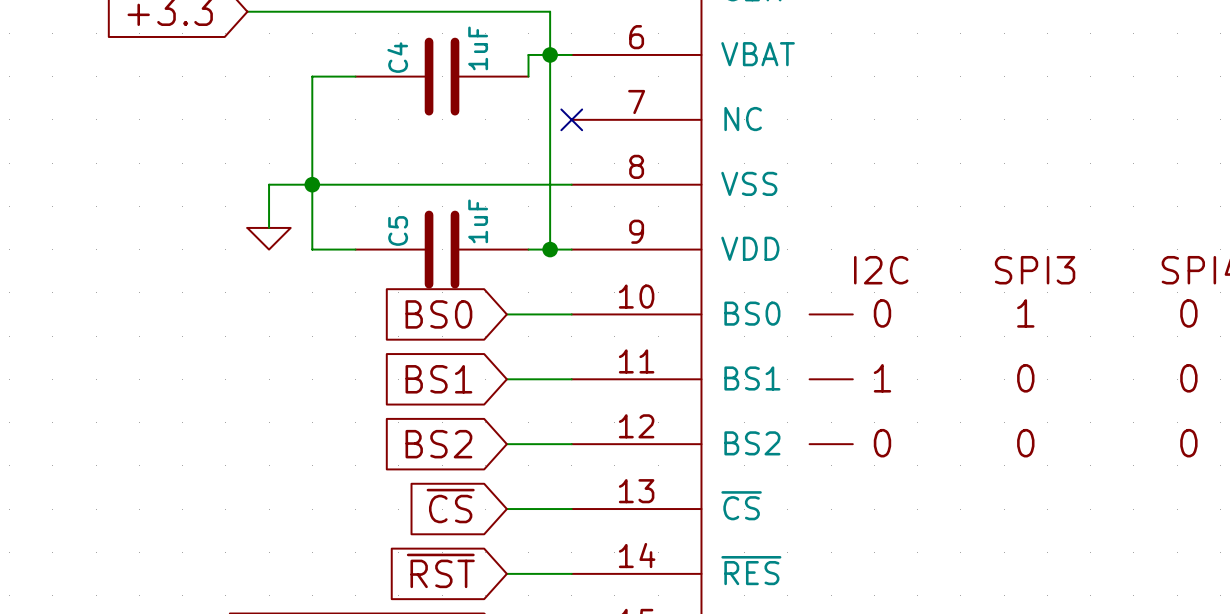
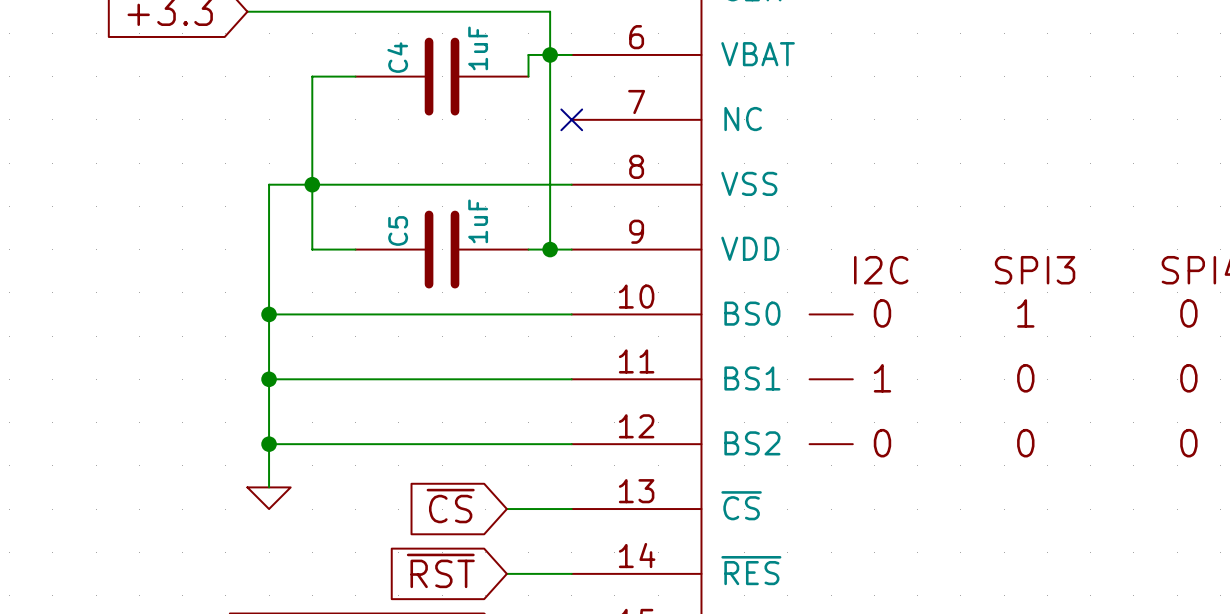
wire: none -> (269, 227) (269, 487)
power symbol position: (269, 238) -> (269, 498)
wire: none -> (269, 314) (506, 314)
junction: none -> (269, 314)
global label: BS0 (438, 314) -> none
wire: none -> (269, 379) (506, 379)
junction: none -> (269, 379)
global label: BS1 (438, 379) -> none
wire: none -> (269, 444) (506, 444)
junction: none -> (269, 444)
global label: BS2 (438, 444) -> none

